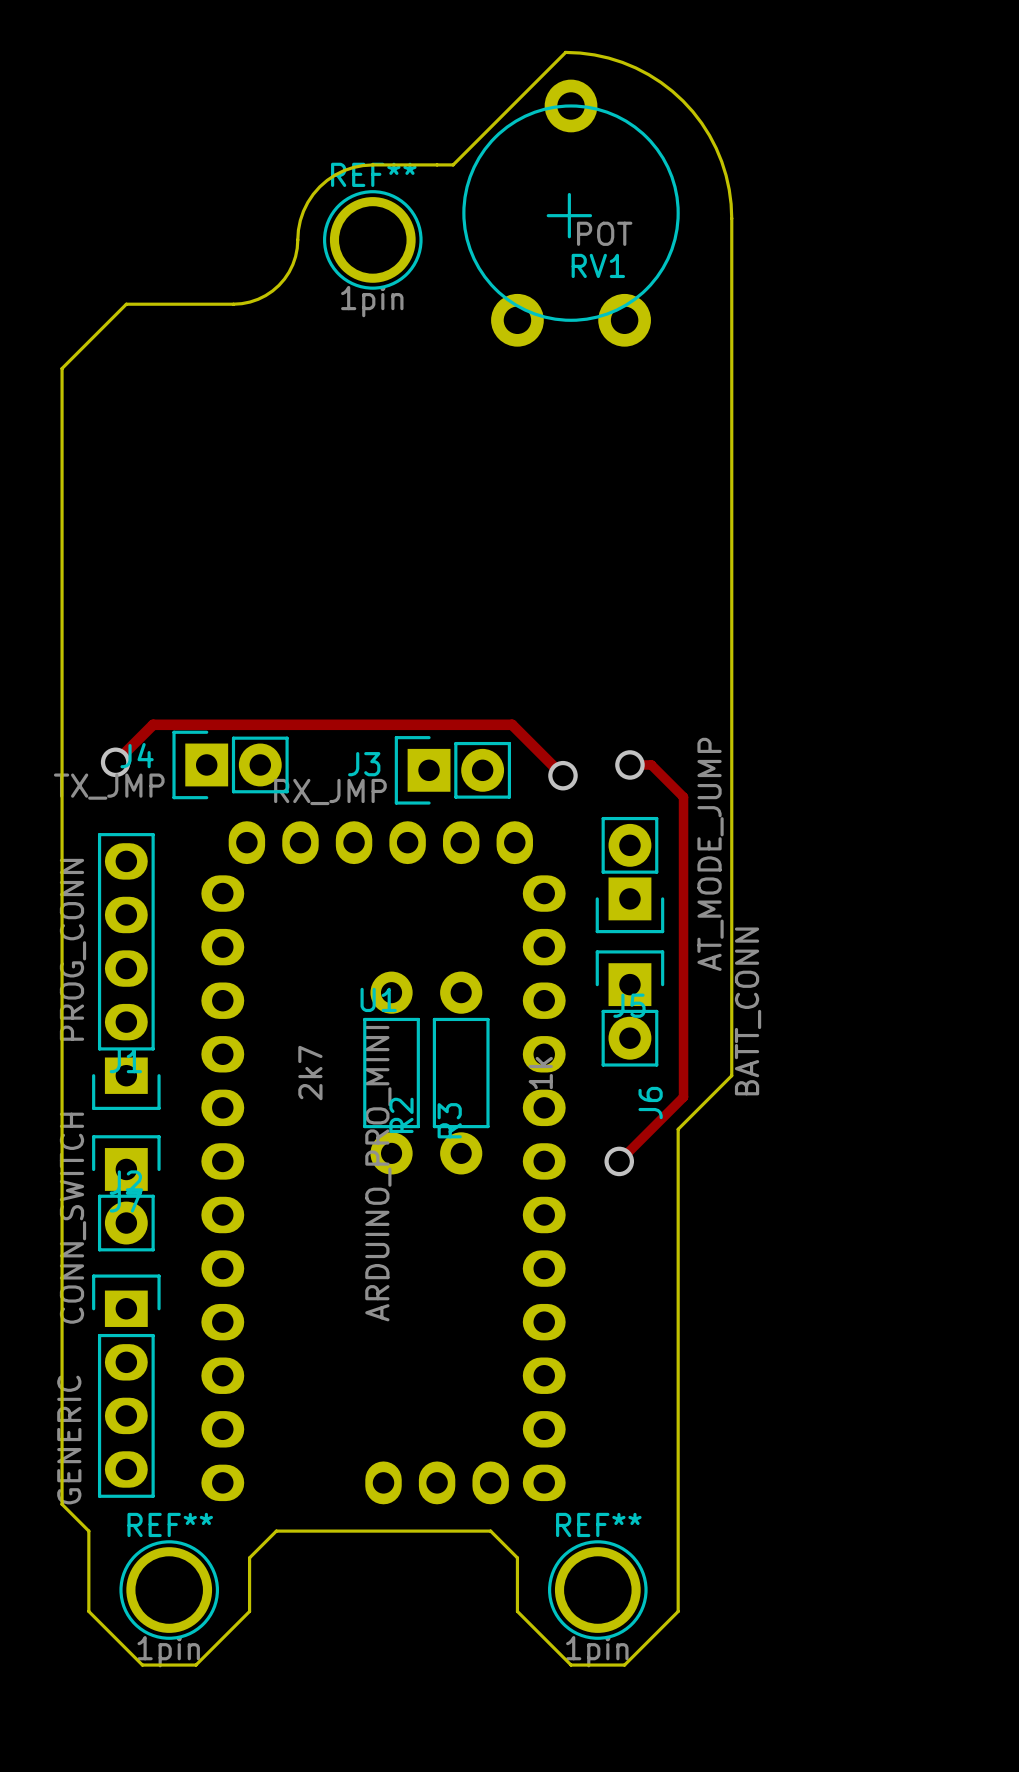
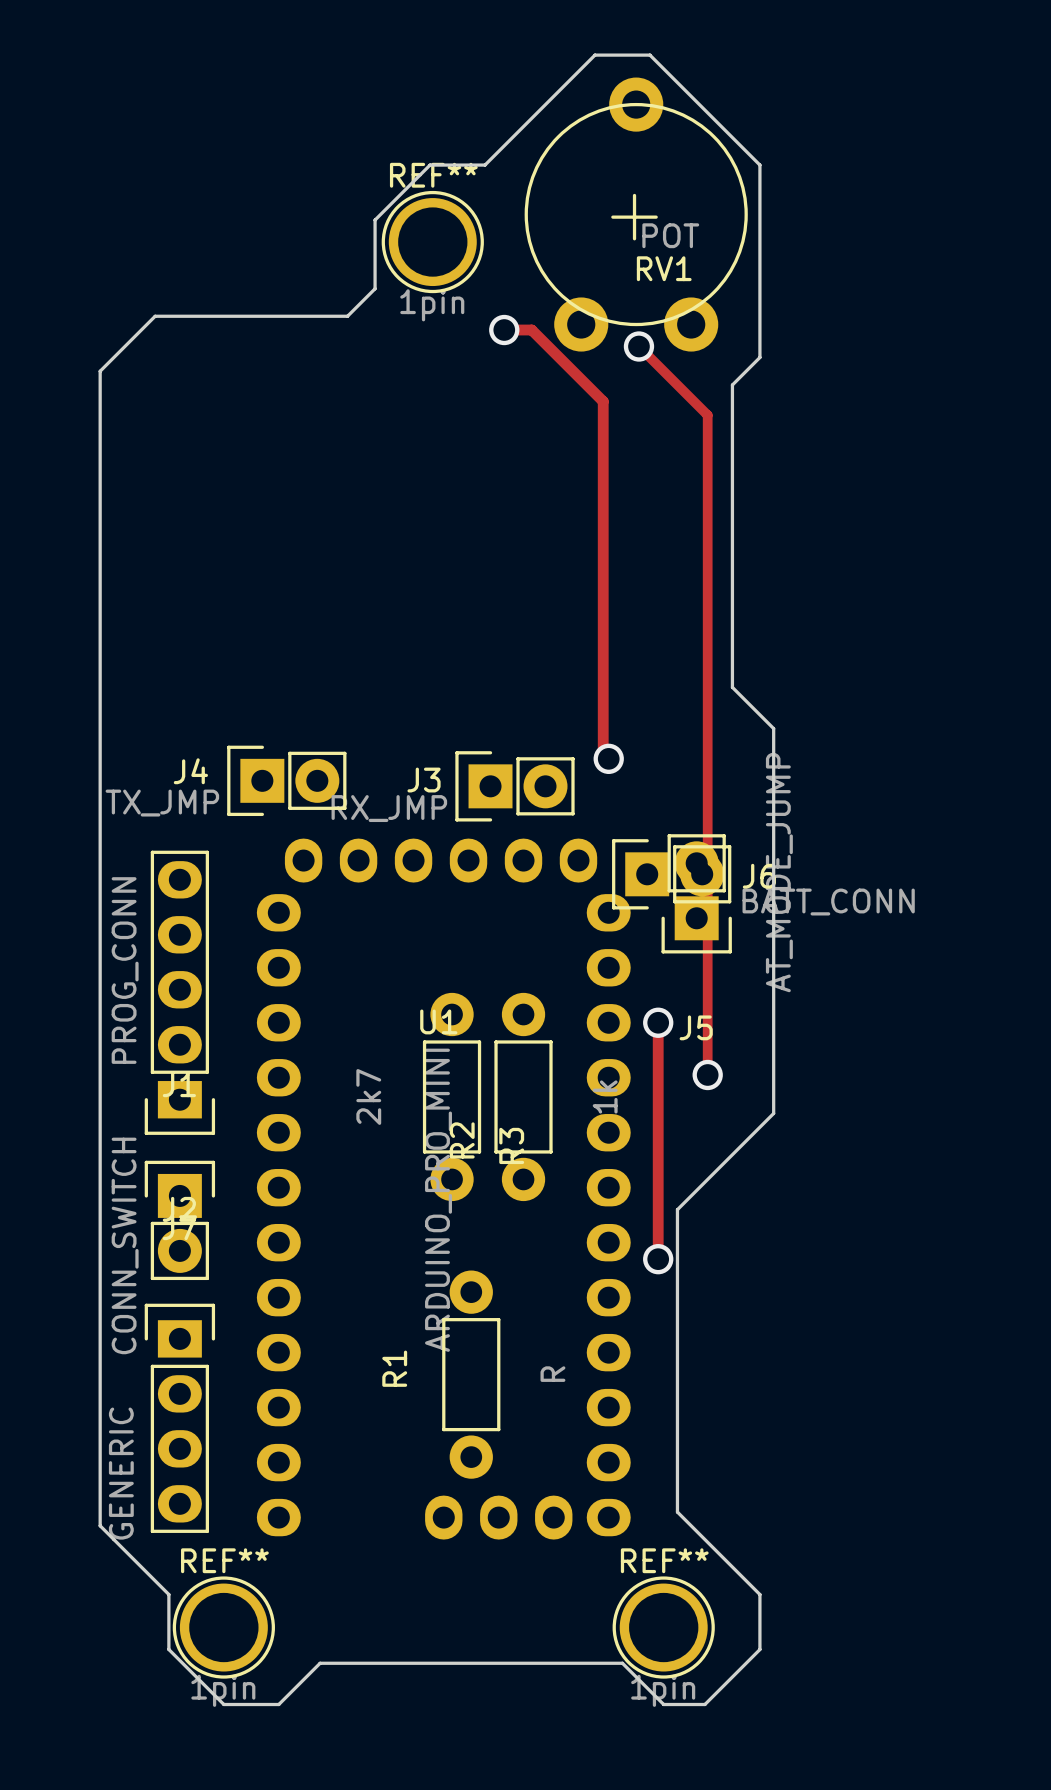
board edge: (372, 164) (344, 170) (327, 180) (313, 194) (300, 220) (297, 248) (292, 264) (284, 279) (265, 295) (250, 302) (233, 304) (126, 304) (62, 368) (62, 1504) -> (432, 165) (430, 165) (375, 220) (375, 288) (347, 316) (155, 316) (100, 371) (100, 1525) (113, 1539)
board edge: (423, 164) (453, 164) (565, 52) (580, 53) (608, 58) (635, 67) (672, 91) (692, 111) (709, 135) (721, 161) (729, 189) (731, 218) (731, 1075) (678, 1129) (678, 1611) (624, 1665) -> (485, 165) (594, 55) (649, 55) (759, 165) (759, 357) (732, 384) (732, 687) (773, 728) (773, 1113) (677, 1209) (677, 1512) (759, 1594) (759, 1649) (704, 1704) (691, 1704)
track: none -> (504, 330) (531, 330) (603, 401) (603, 753) (608, 758)
via: none -> (504, 330)
track: none -> (638, 346) (707, 415) (707, 1074)
via: none -> (638, 346)
track: (115, 762) (153, 724) (512, 724) (562, 775) -> none
via: (115, 762) -> none
track: (629, 764) (651, 764) (683, 797) (683, 1097) (619, 1161) -> none
via: (629, 764) -> none
via position: (562, 775) -> (608, 758)
track: none -> (658, 1022) (658, 1259)
via: none -> (658, 1022)
J6 rotation: 0° (629, 1008) -> 90° counterclockwise (671, 874)
J6 position: (629, 1008) -> (671, 874)
J6 value position: BATT_CONN (748, 1011) -> BATT_CONN (828, 902)
via: none -> (707, 1074)
via: (619, 1161) -> none
via: none -> (658, 1259)
R1: none -> R (471, 1374)
board edge: (88, 1531) (88, 1611) (142, 1665) (169, 1665) -> (141, 1567) (168, 1594) (168, 1649) (223, 1704)
board edge: (195, 1665) (249, 1611) (249, 1557) (276, 1531) (490, 1531) (517, 1557) (517, 1611) (571, 1665) (597, 1665) -> (251, 1704) (278, 1704) (320, 1663) (622, 1663) (663, 1704)

